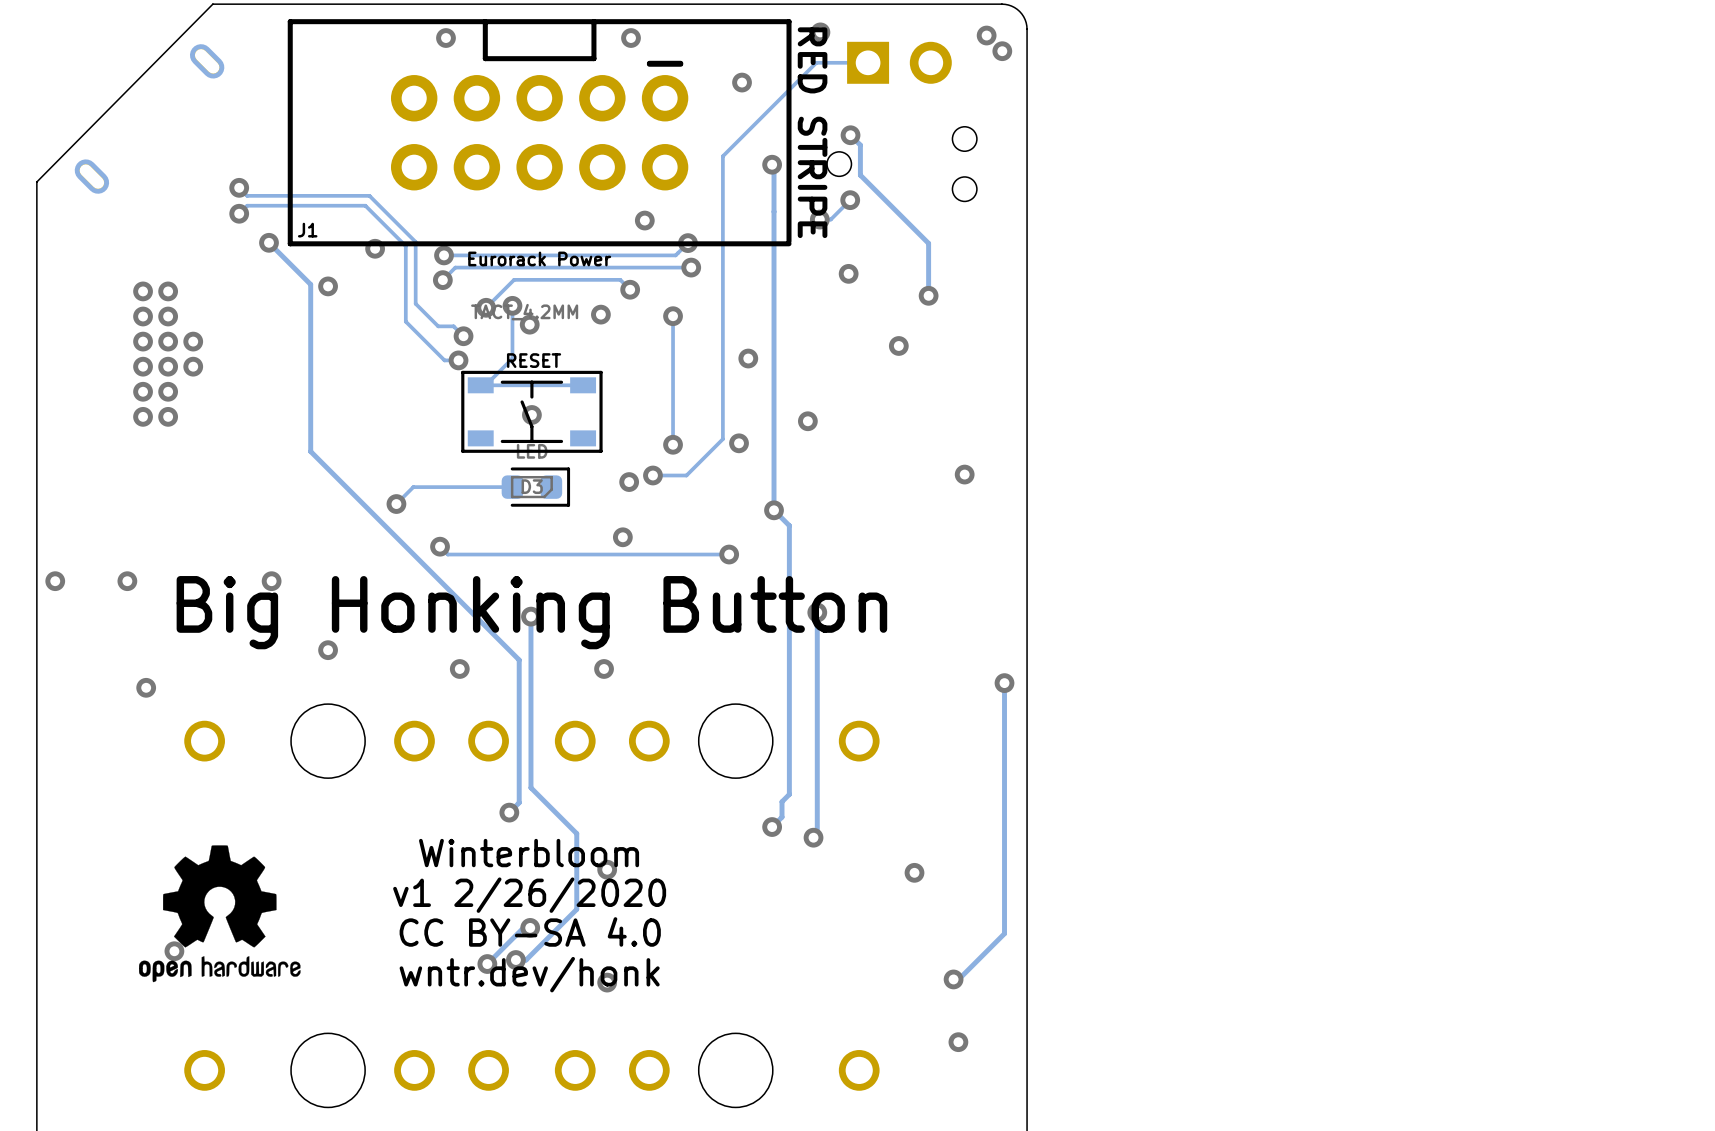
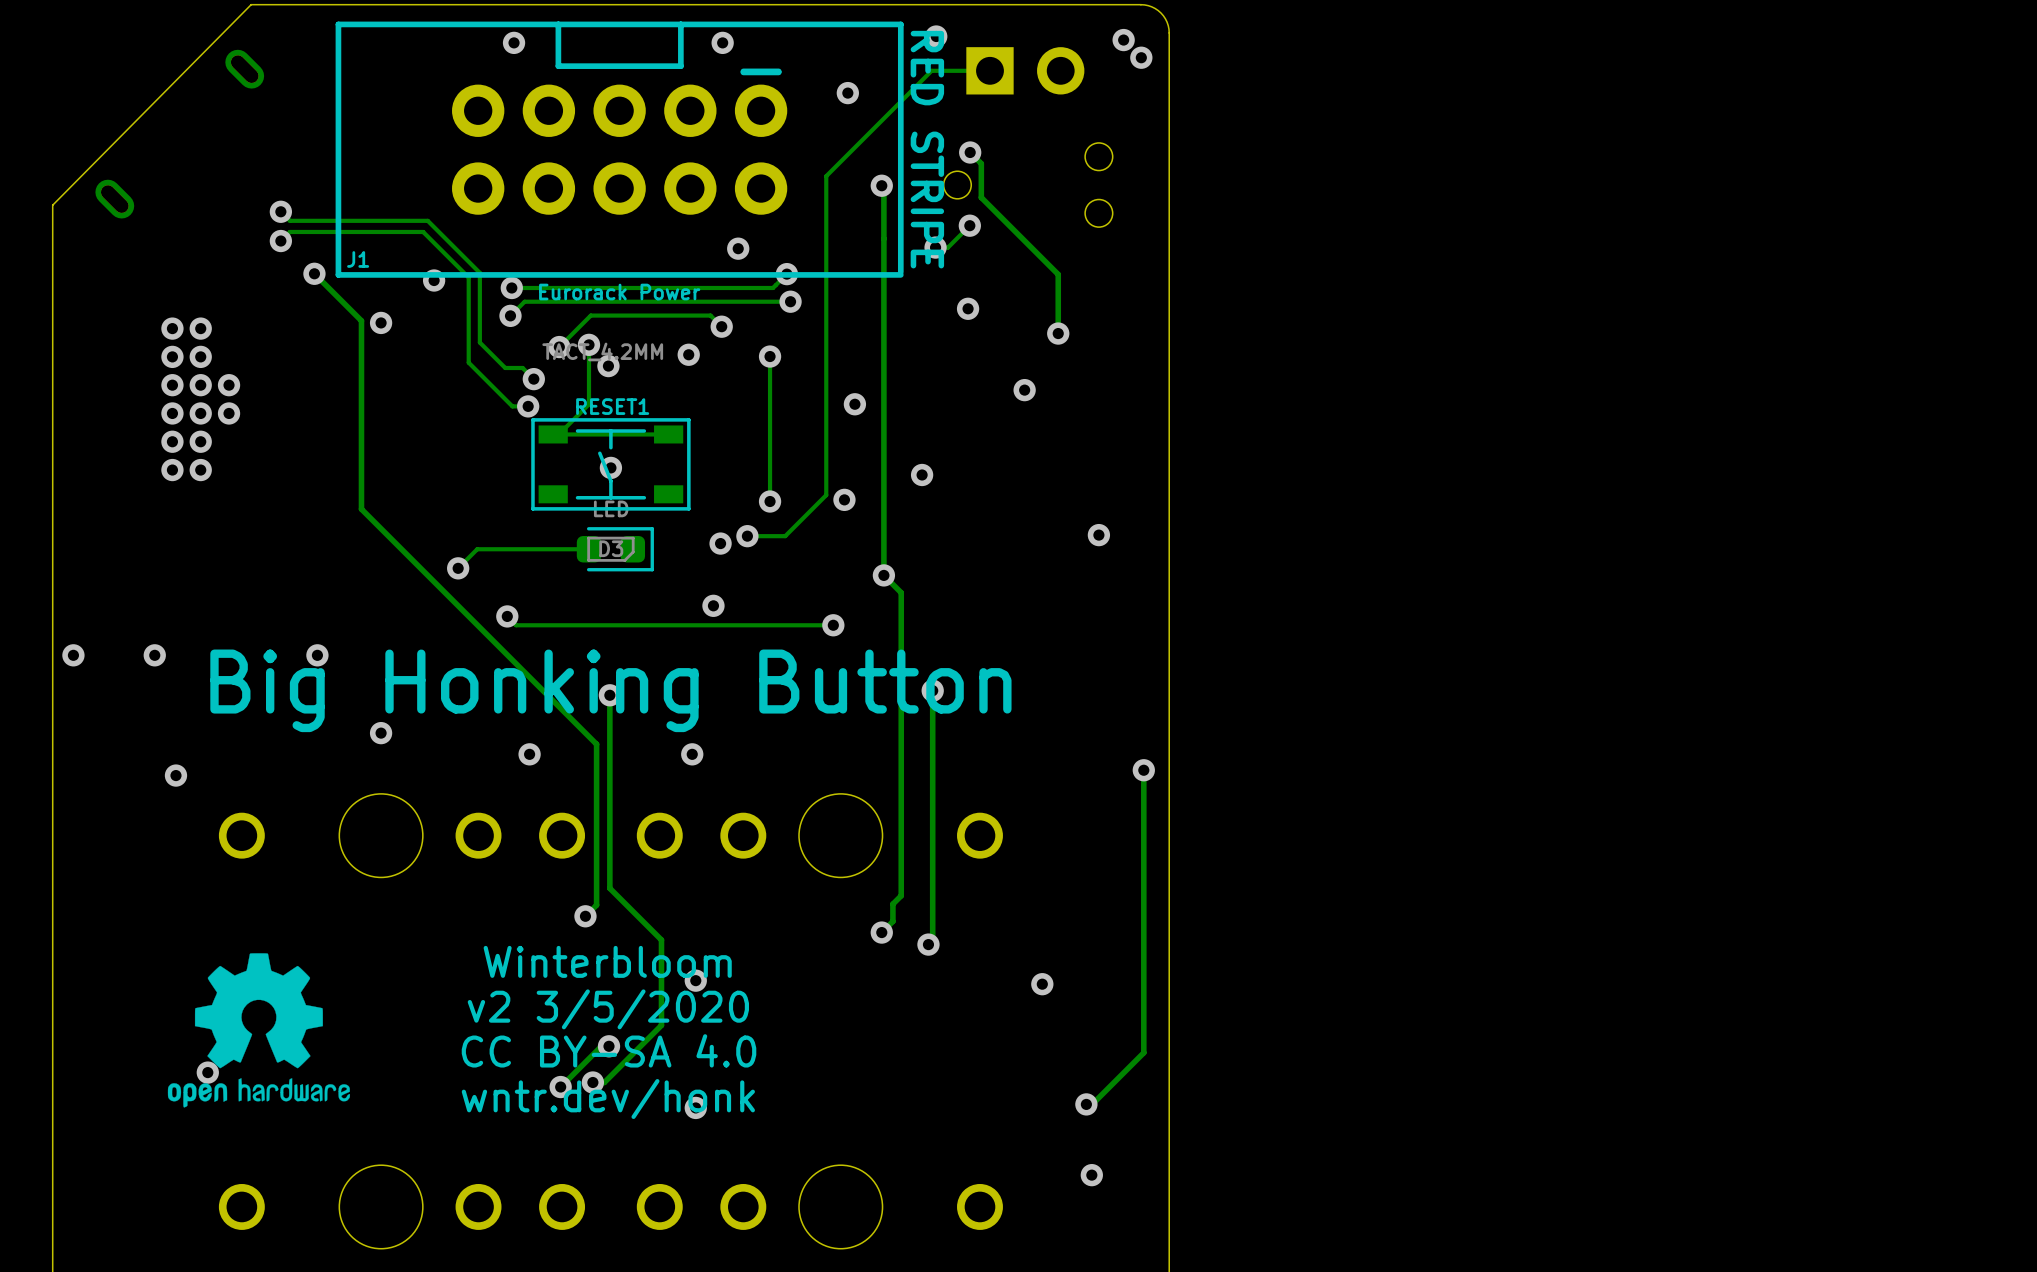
RESET name: RESET (534, 360) -> RESET1 (612, 406)
text: v1 2/26/2020 (529, 895) -> v2 3/5/2020 (608, 1009)

